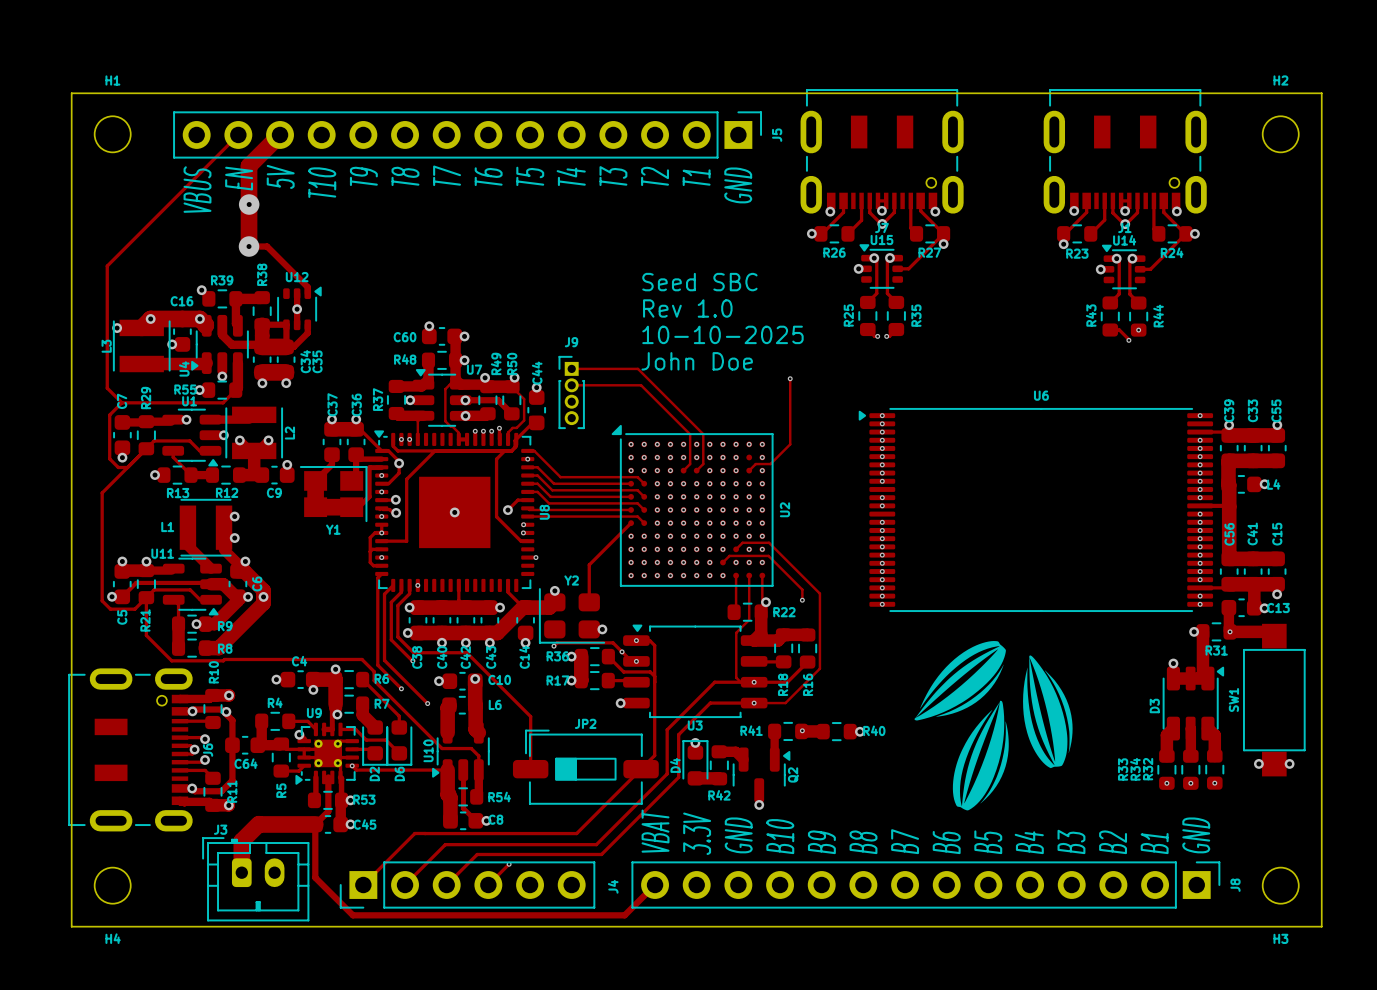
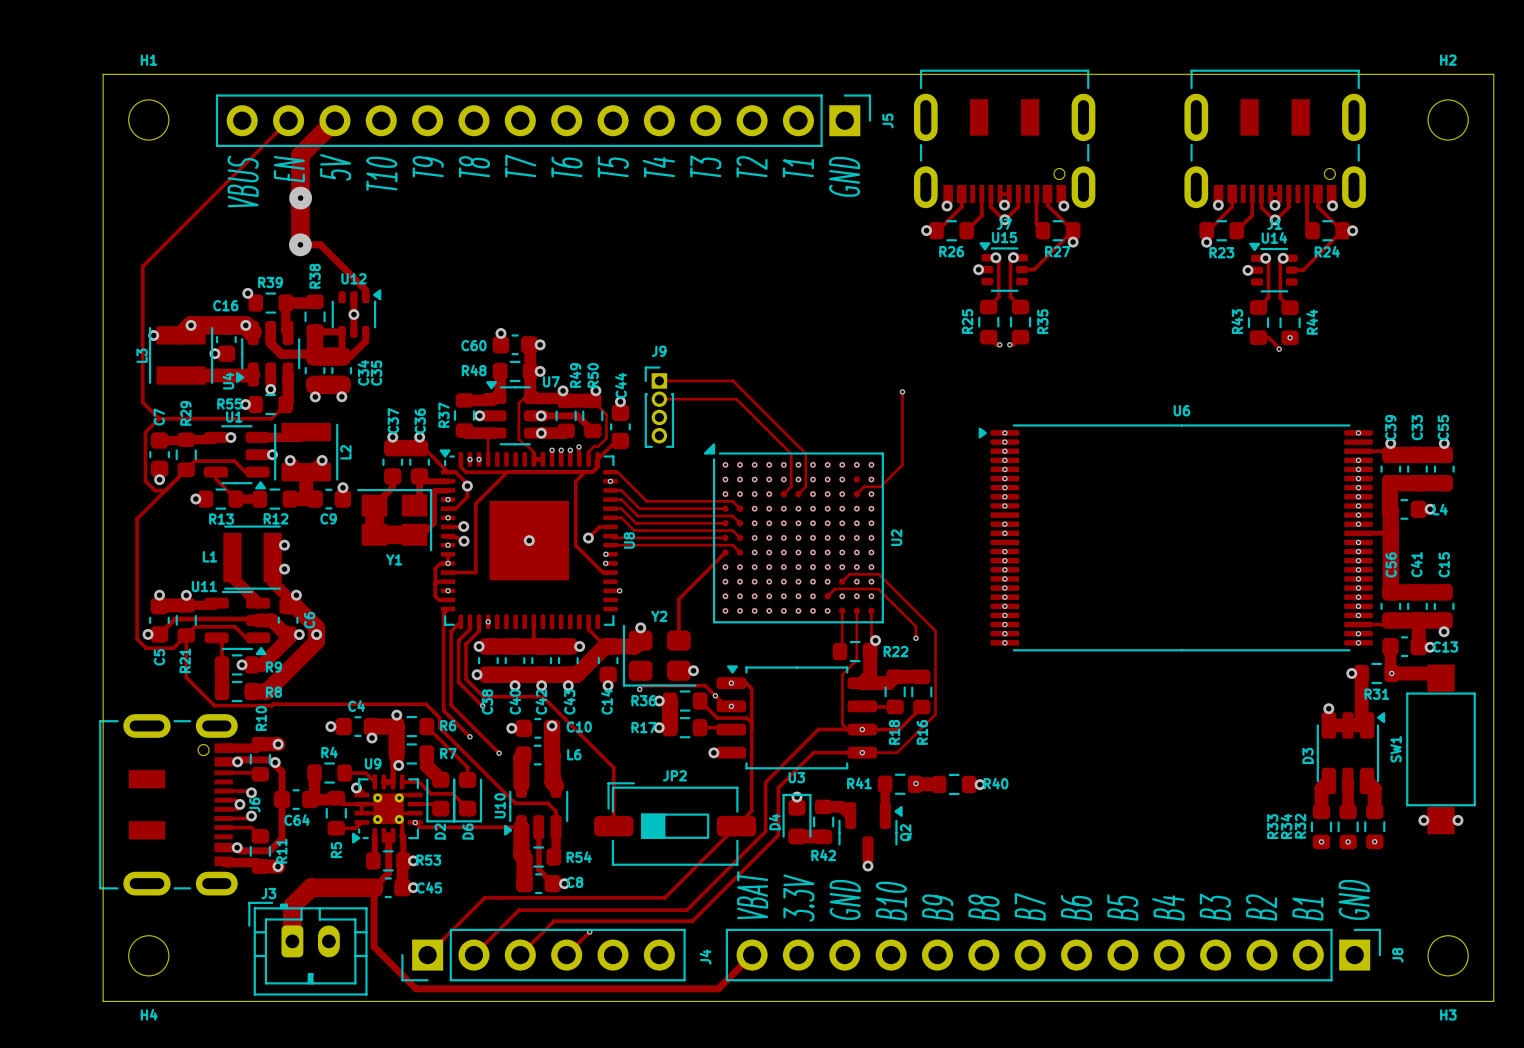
text: Seed SBC (699, 282) -> none
text: Rev 1.0 (687, 308) -> none
text: 10-10-2025 (722, 334) -> none
text: John Doe (697, 361) -> none
drawing: [914, 641, 1073, 811] -> none

